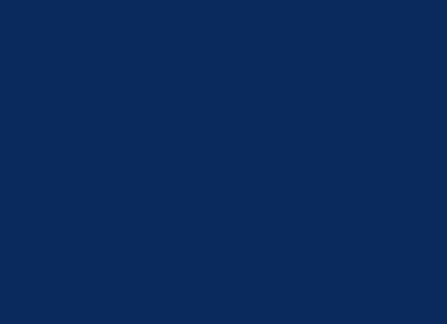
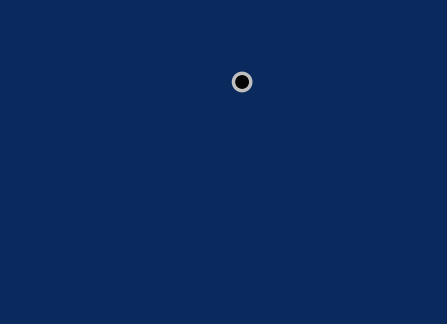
via: none -> (242, 81)

